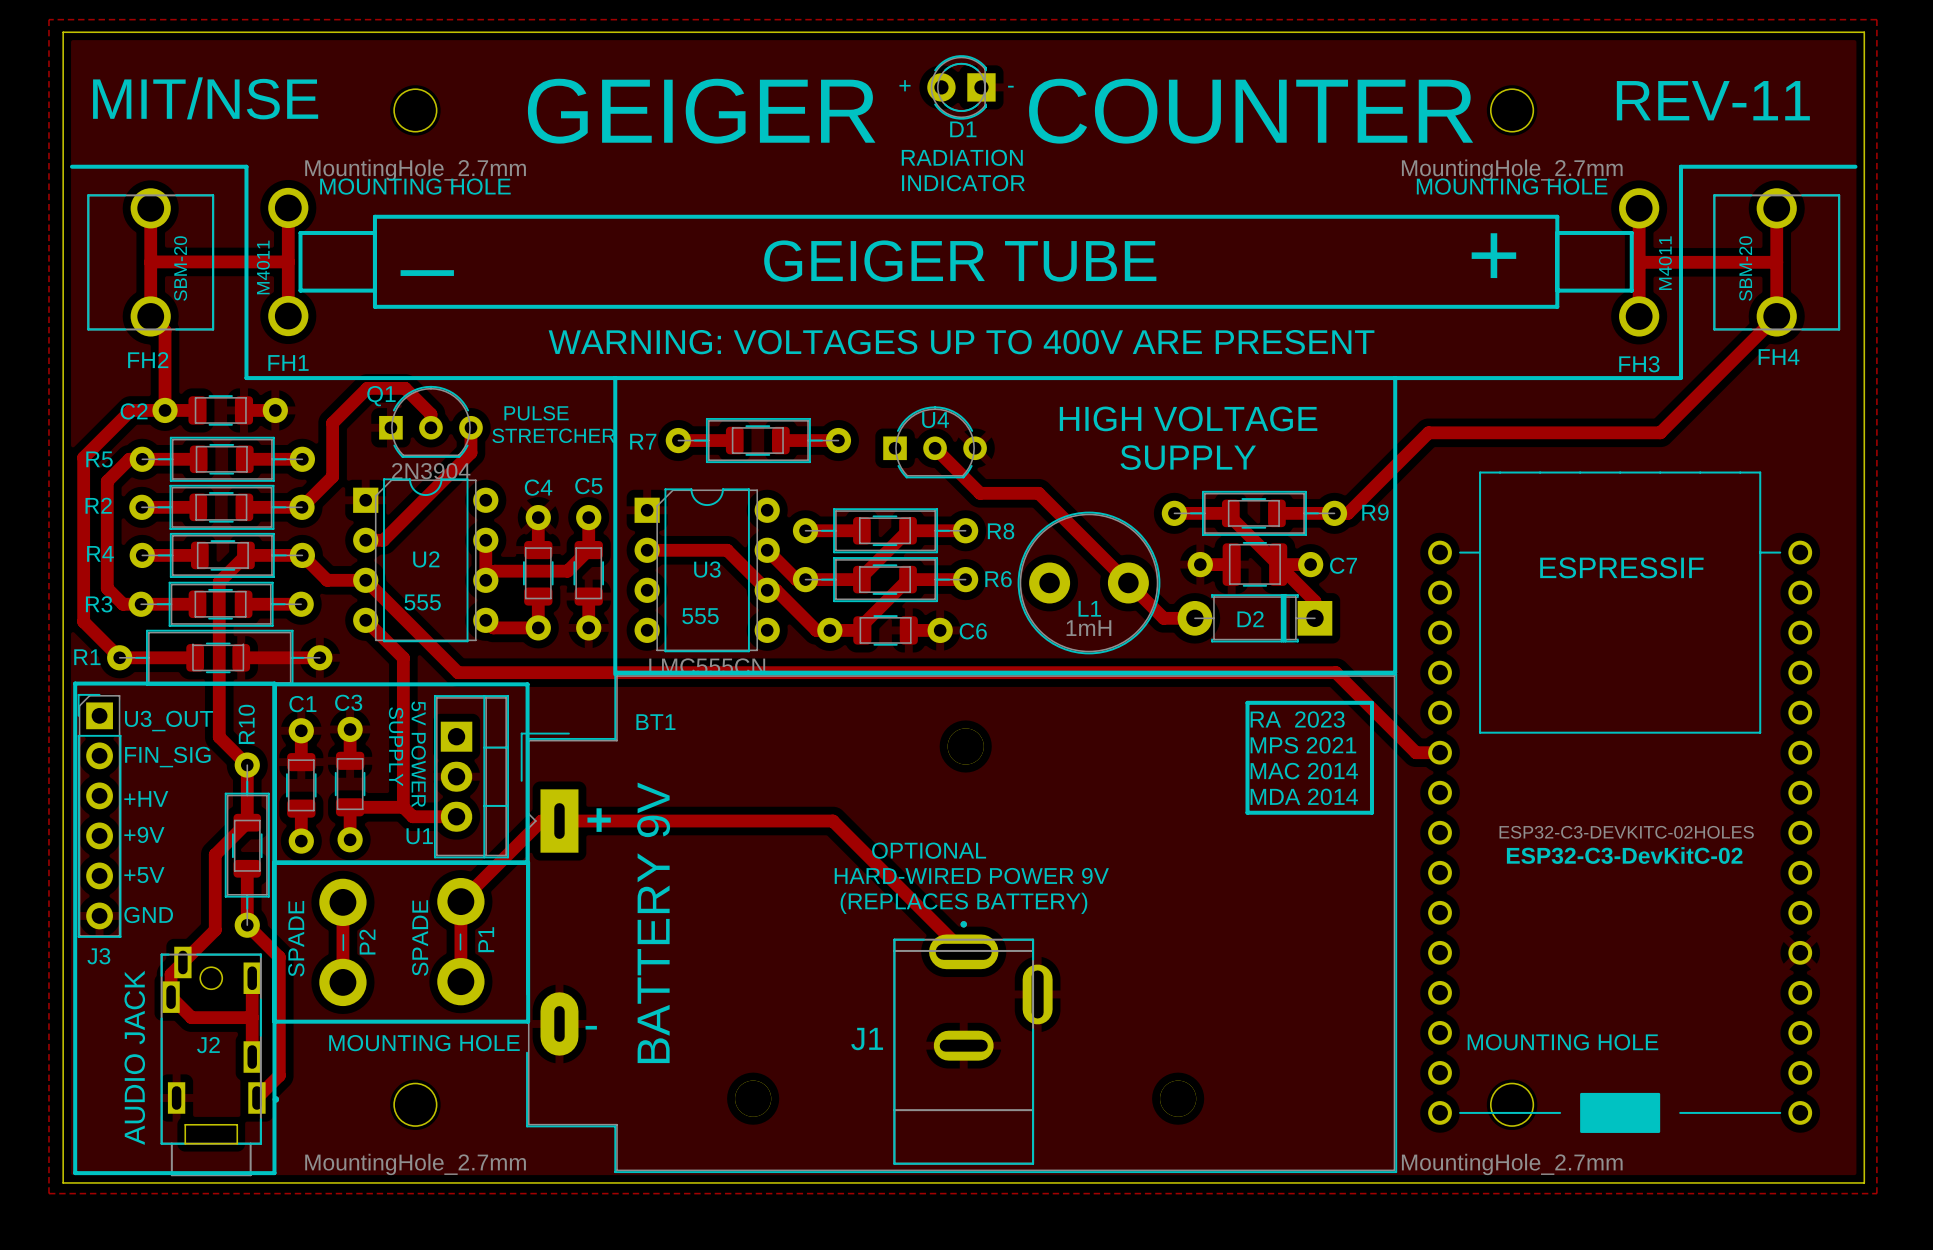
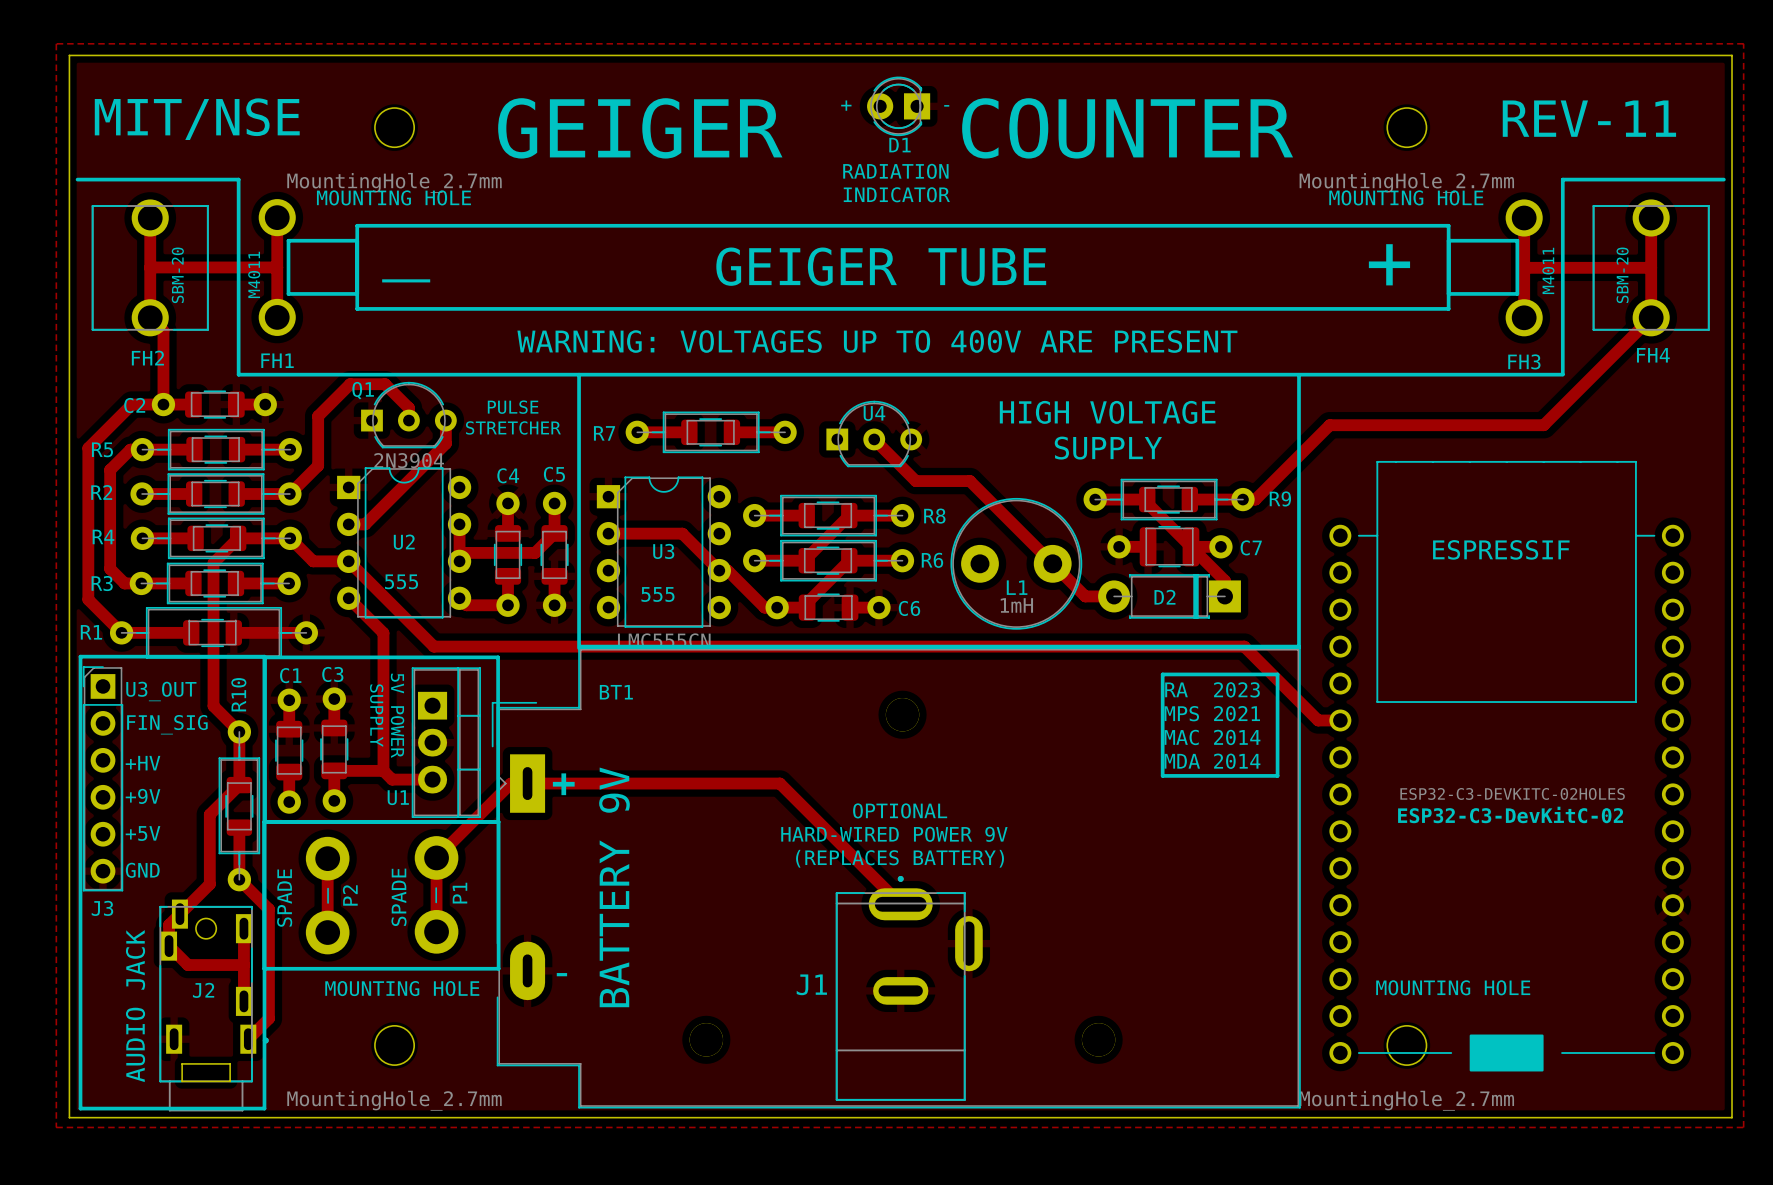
track: (767, 550) (796, 579) (805, 579) -> none

